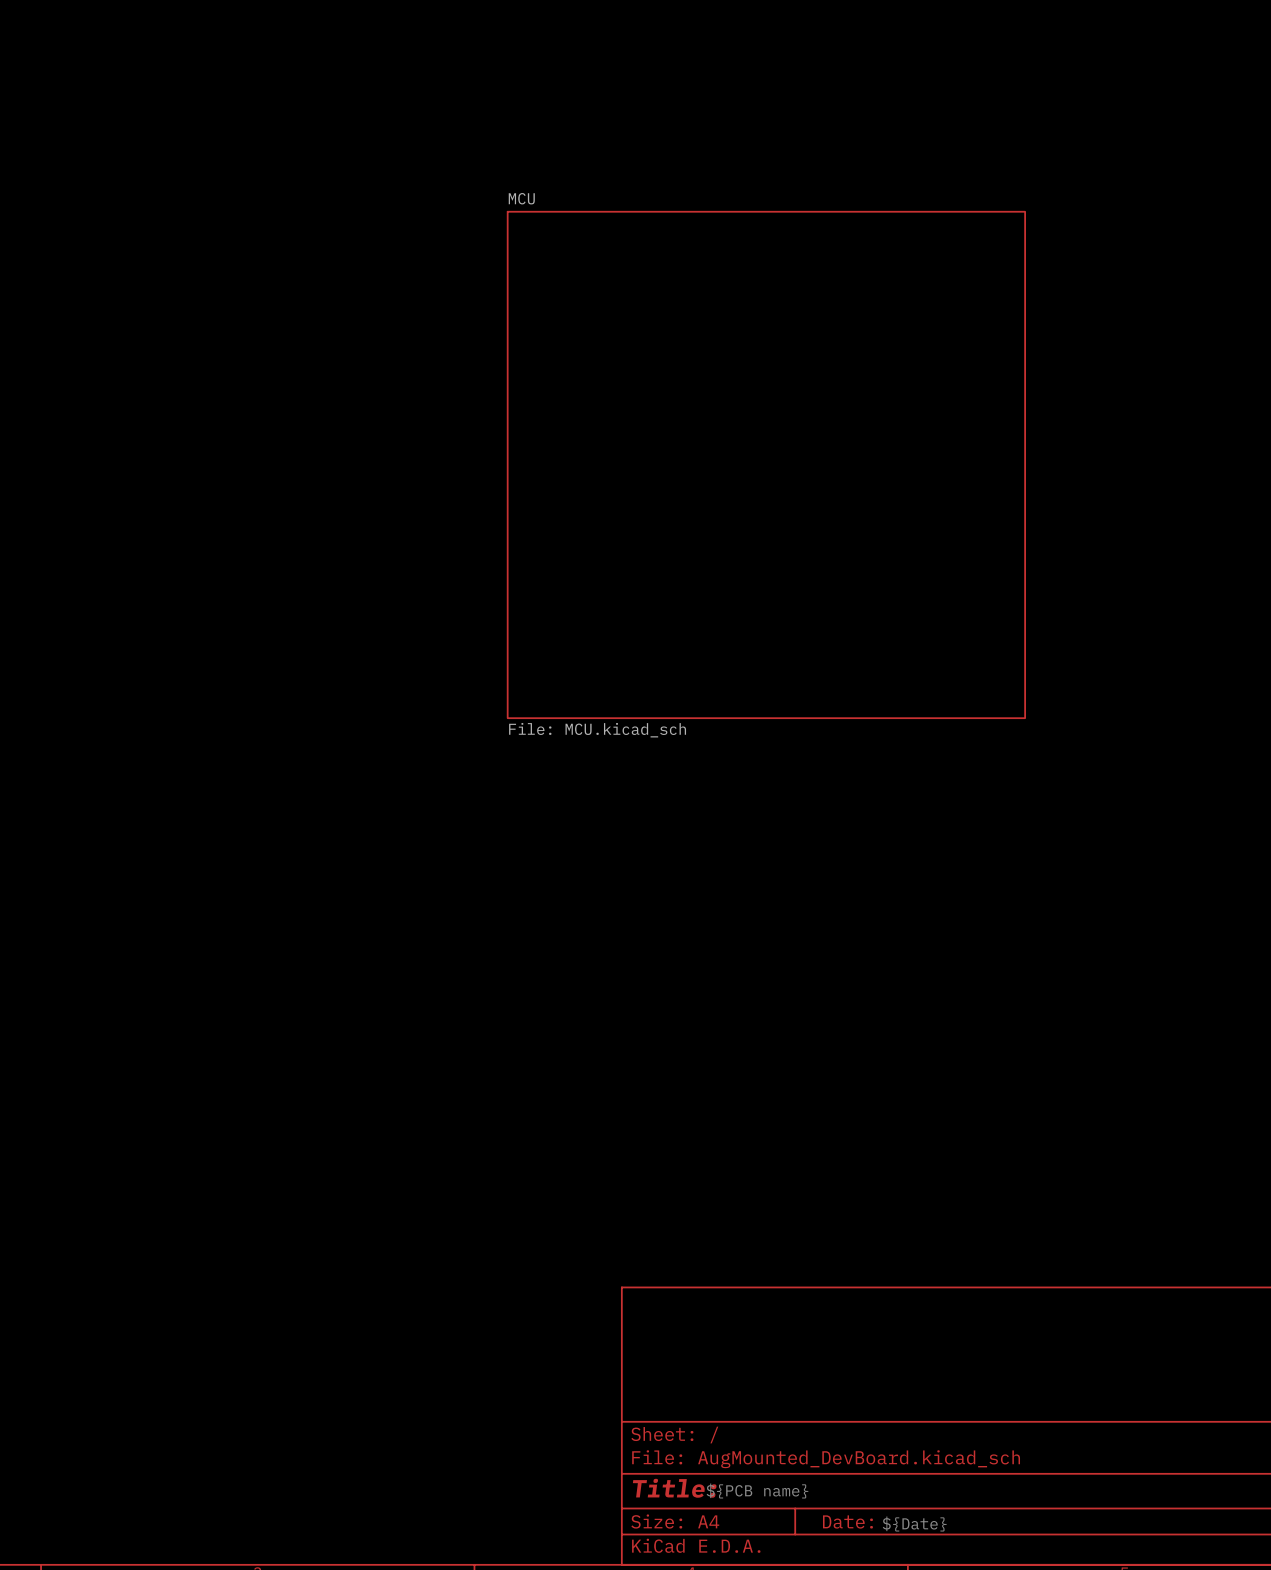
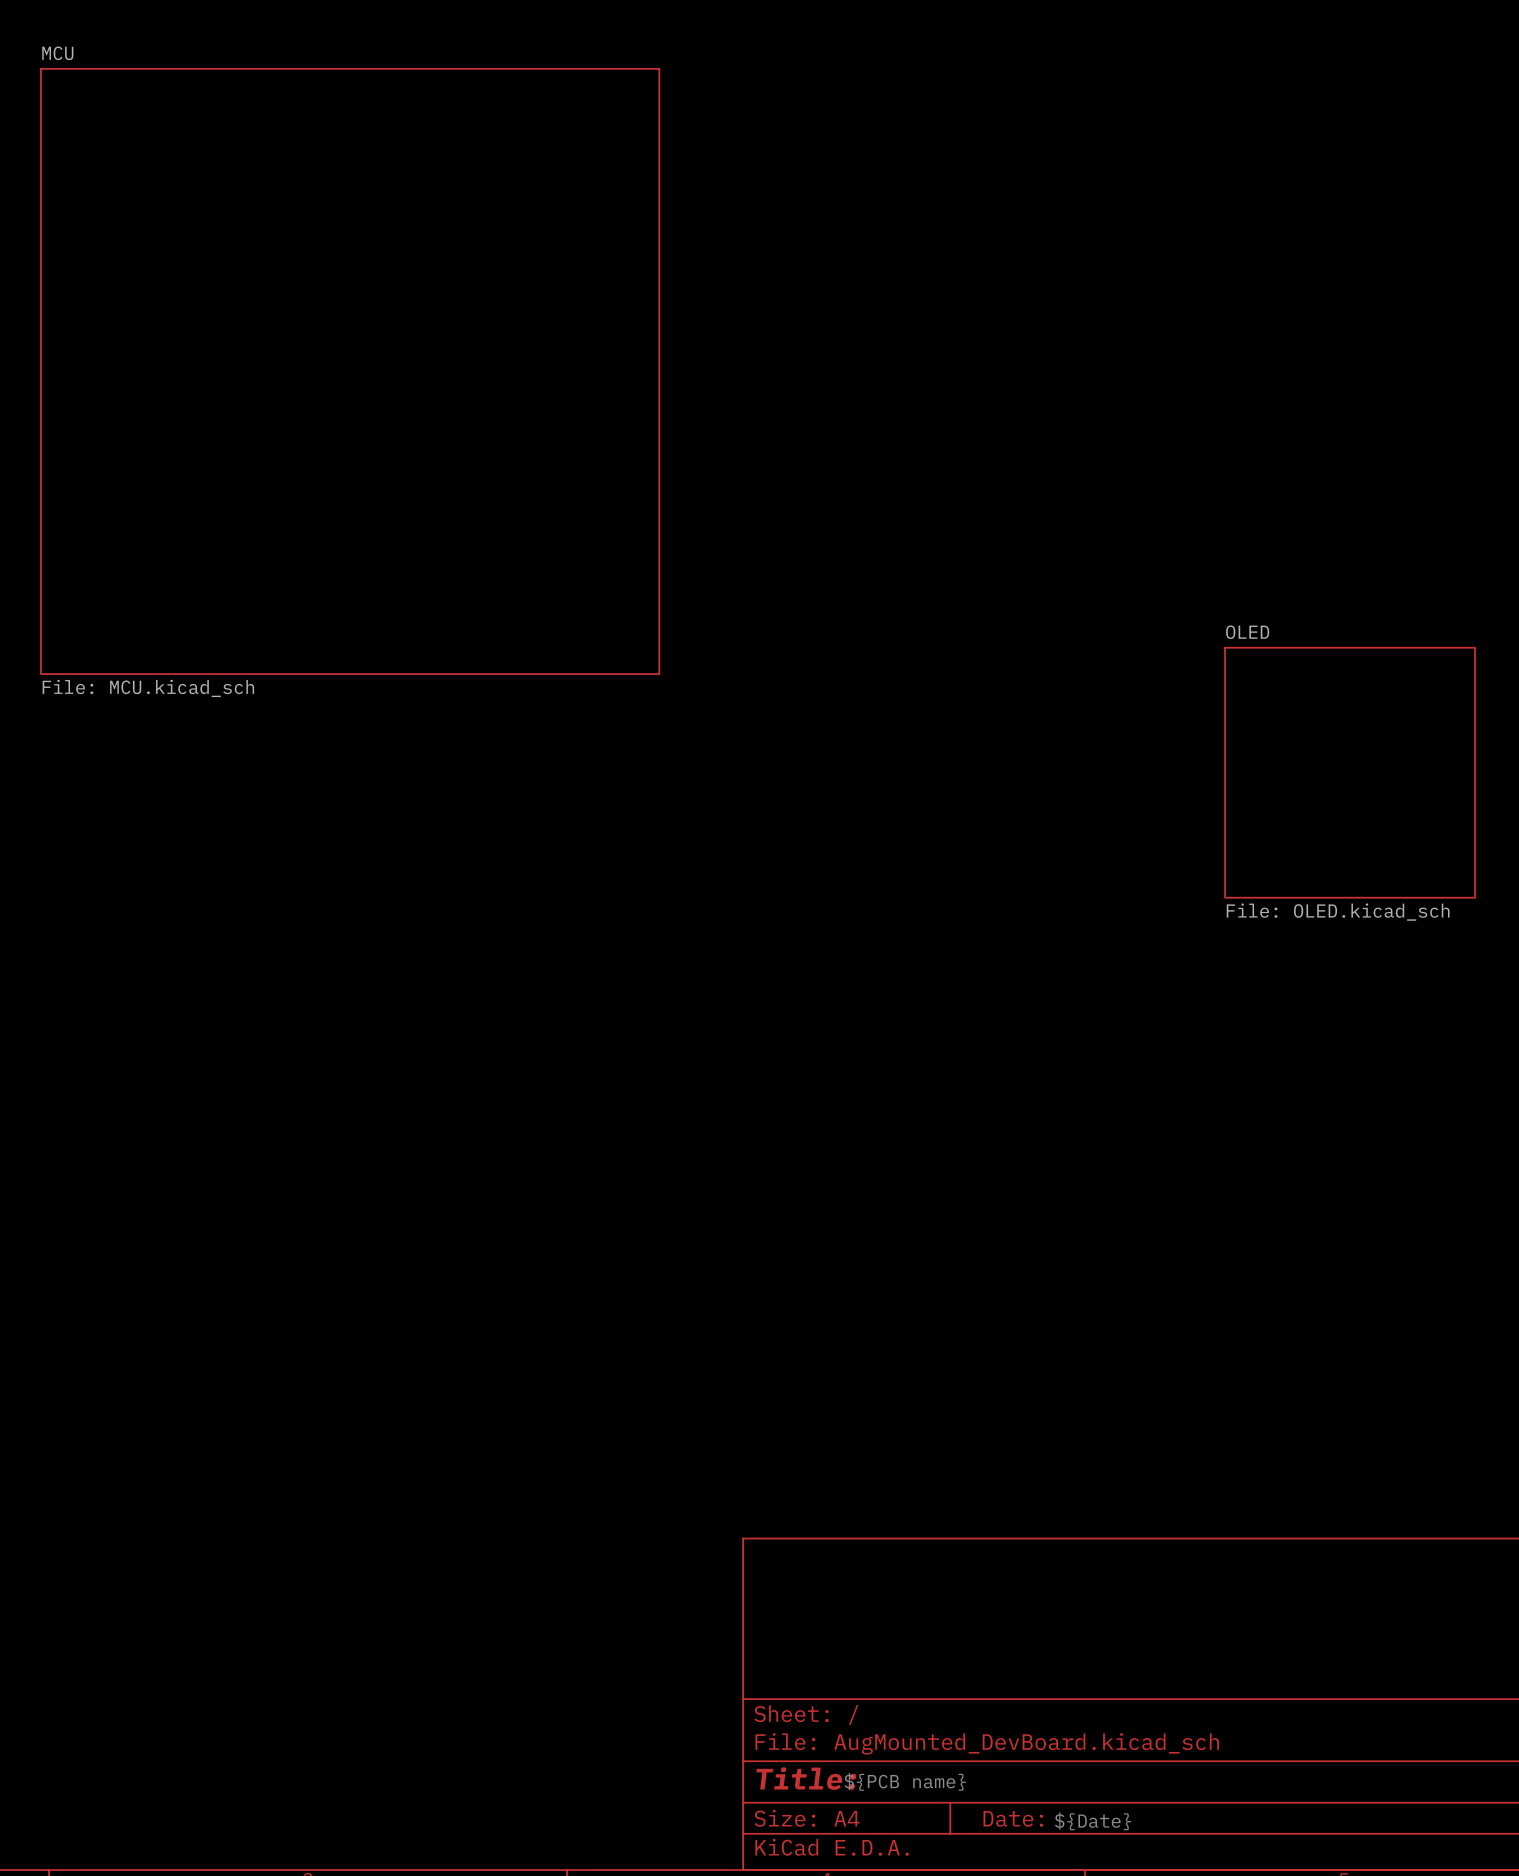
sheet MCU: none -> File: MCU.kicad_sch (350, 371)
sheet MCU: File: MCU.kicad_sch (766, 464) -> none
sheet OLED: none -> File: OLED.kicad_sch (1350, 772)

